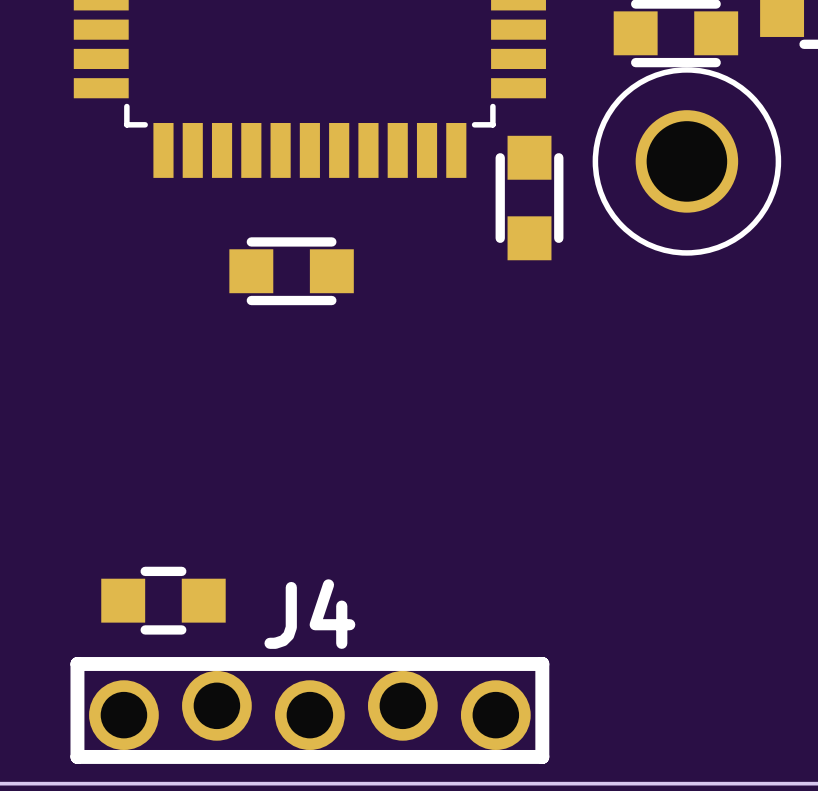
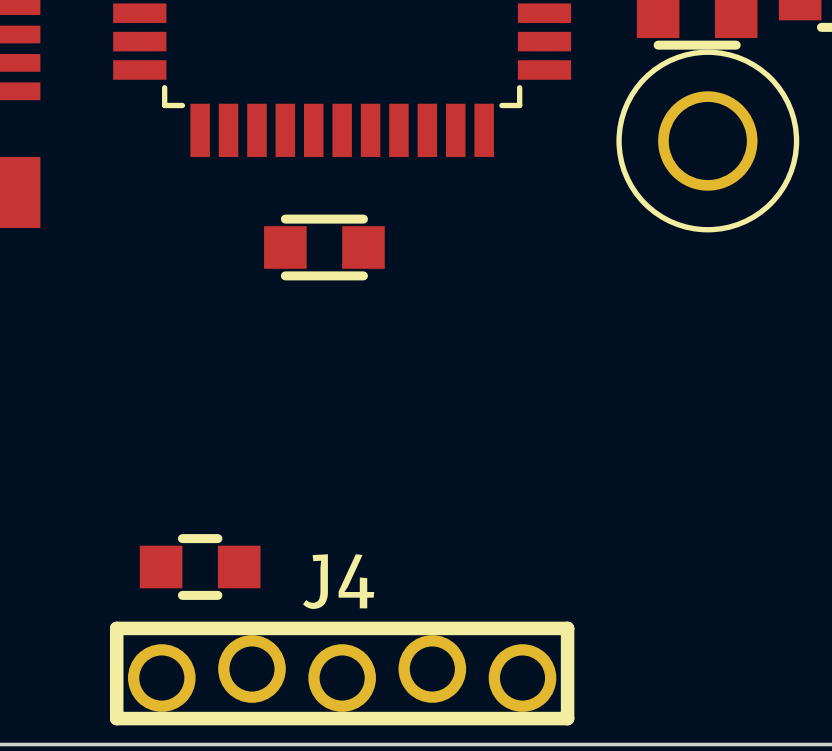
part: (529, 198) -> none

